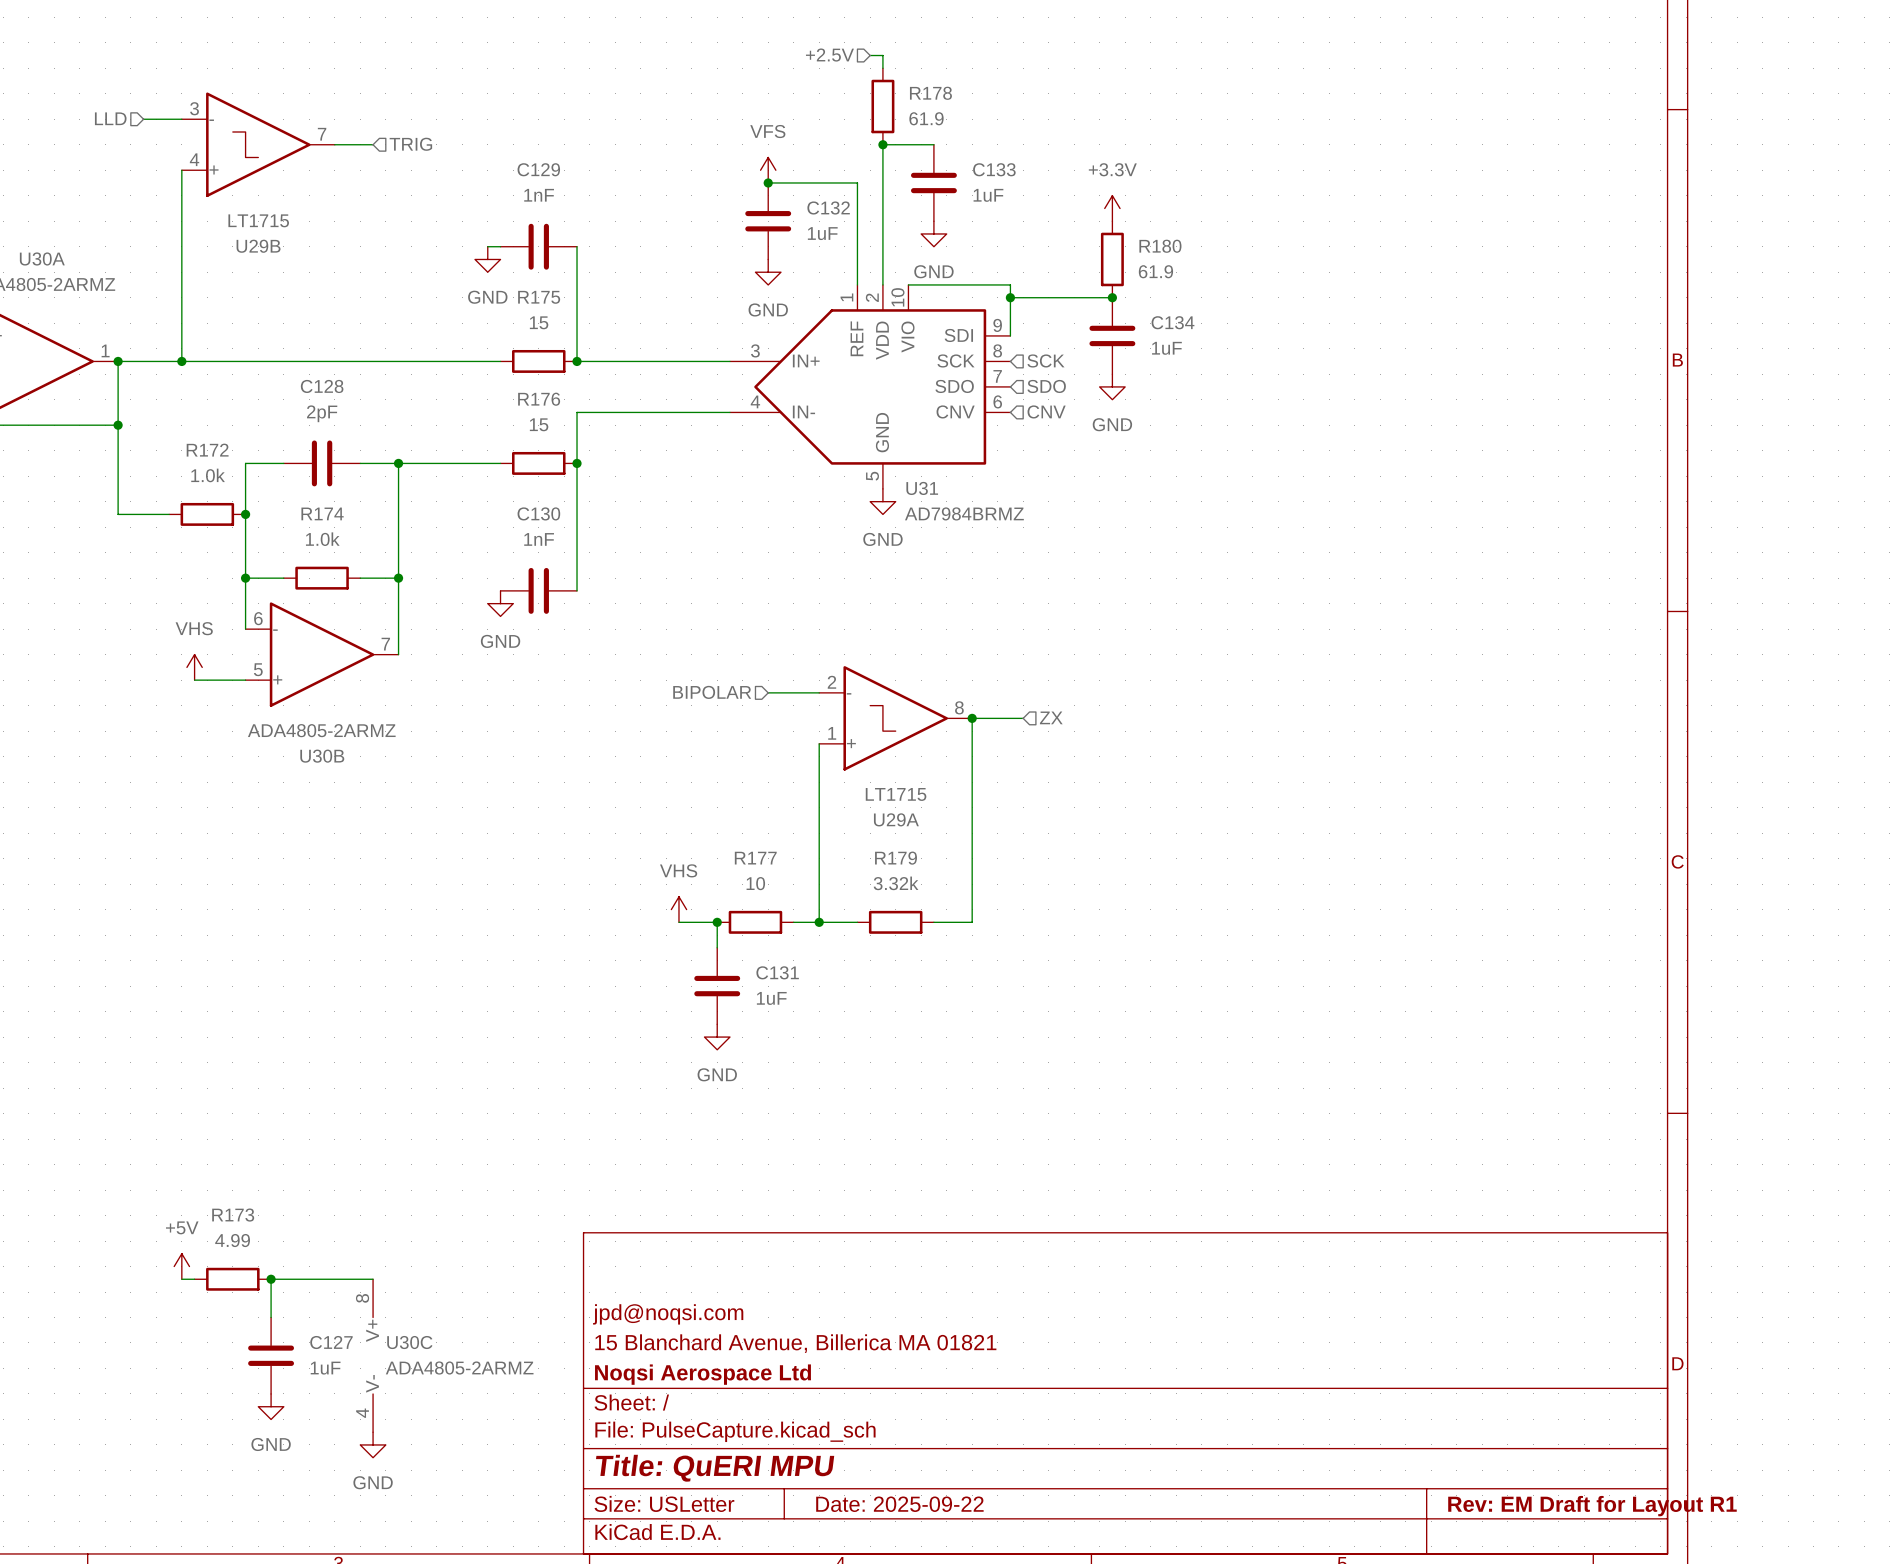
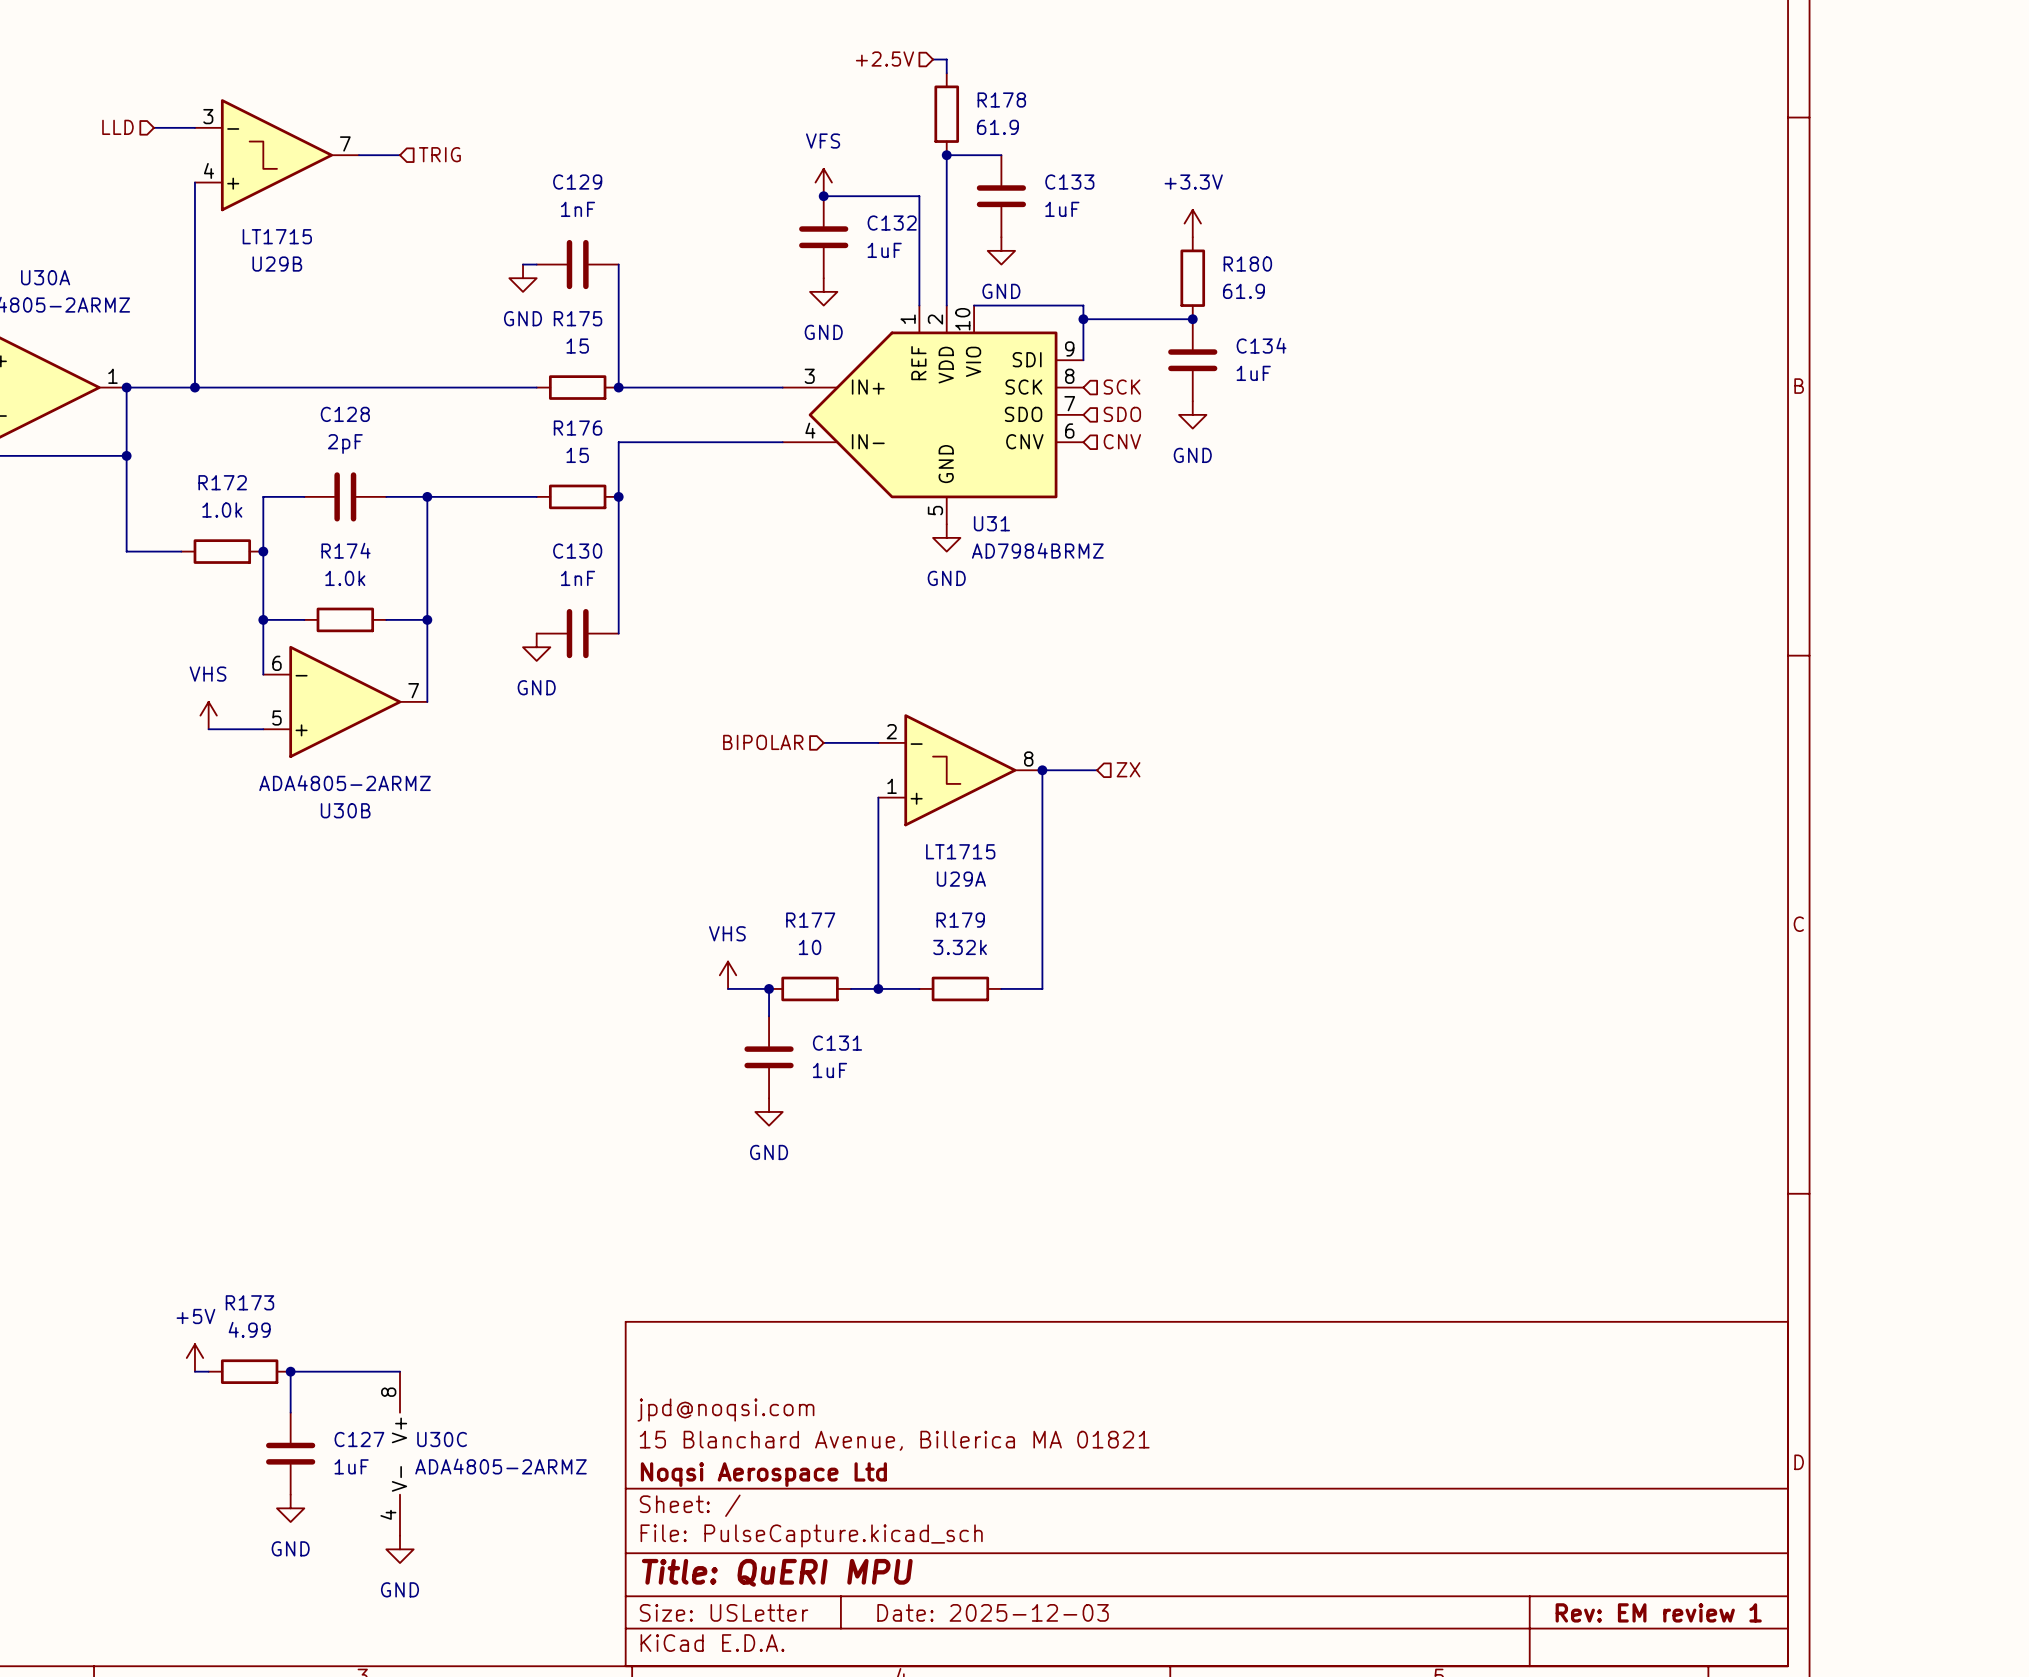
title block: Date: 2025-09-22 (899, 1504) -> Date: 2025-12-03 (993, 1612)
title block: Rev: EM Draft for Layout R1 (1592, 1506) -> Rev: EM review 1 (1658, 1612)

